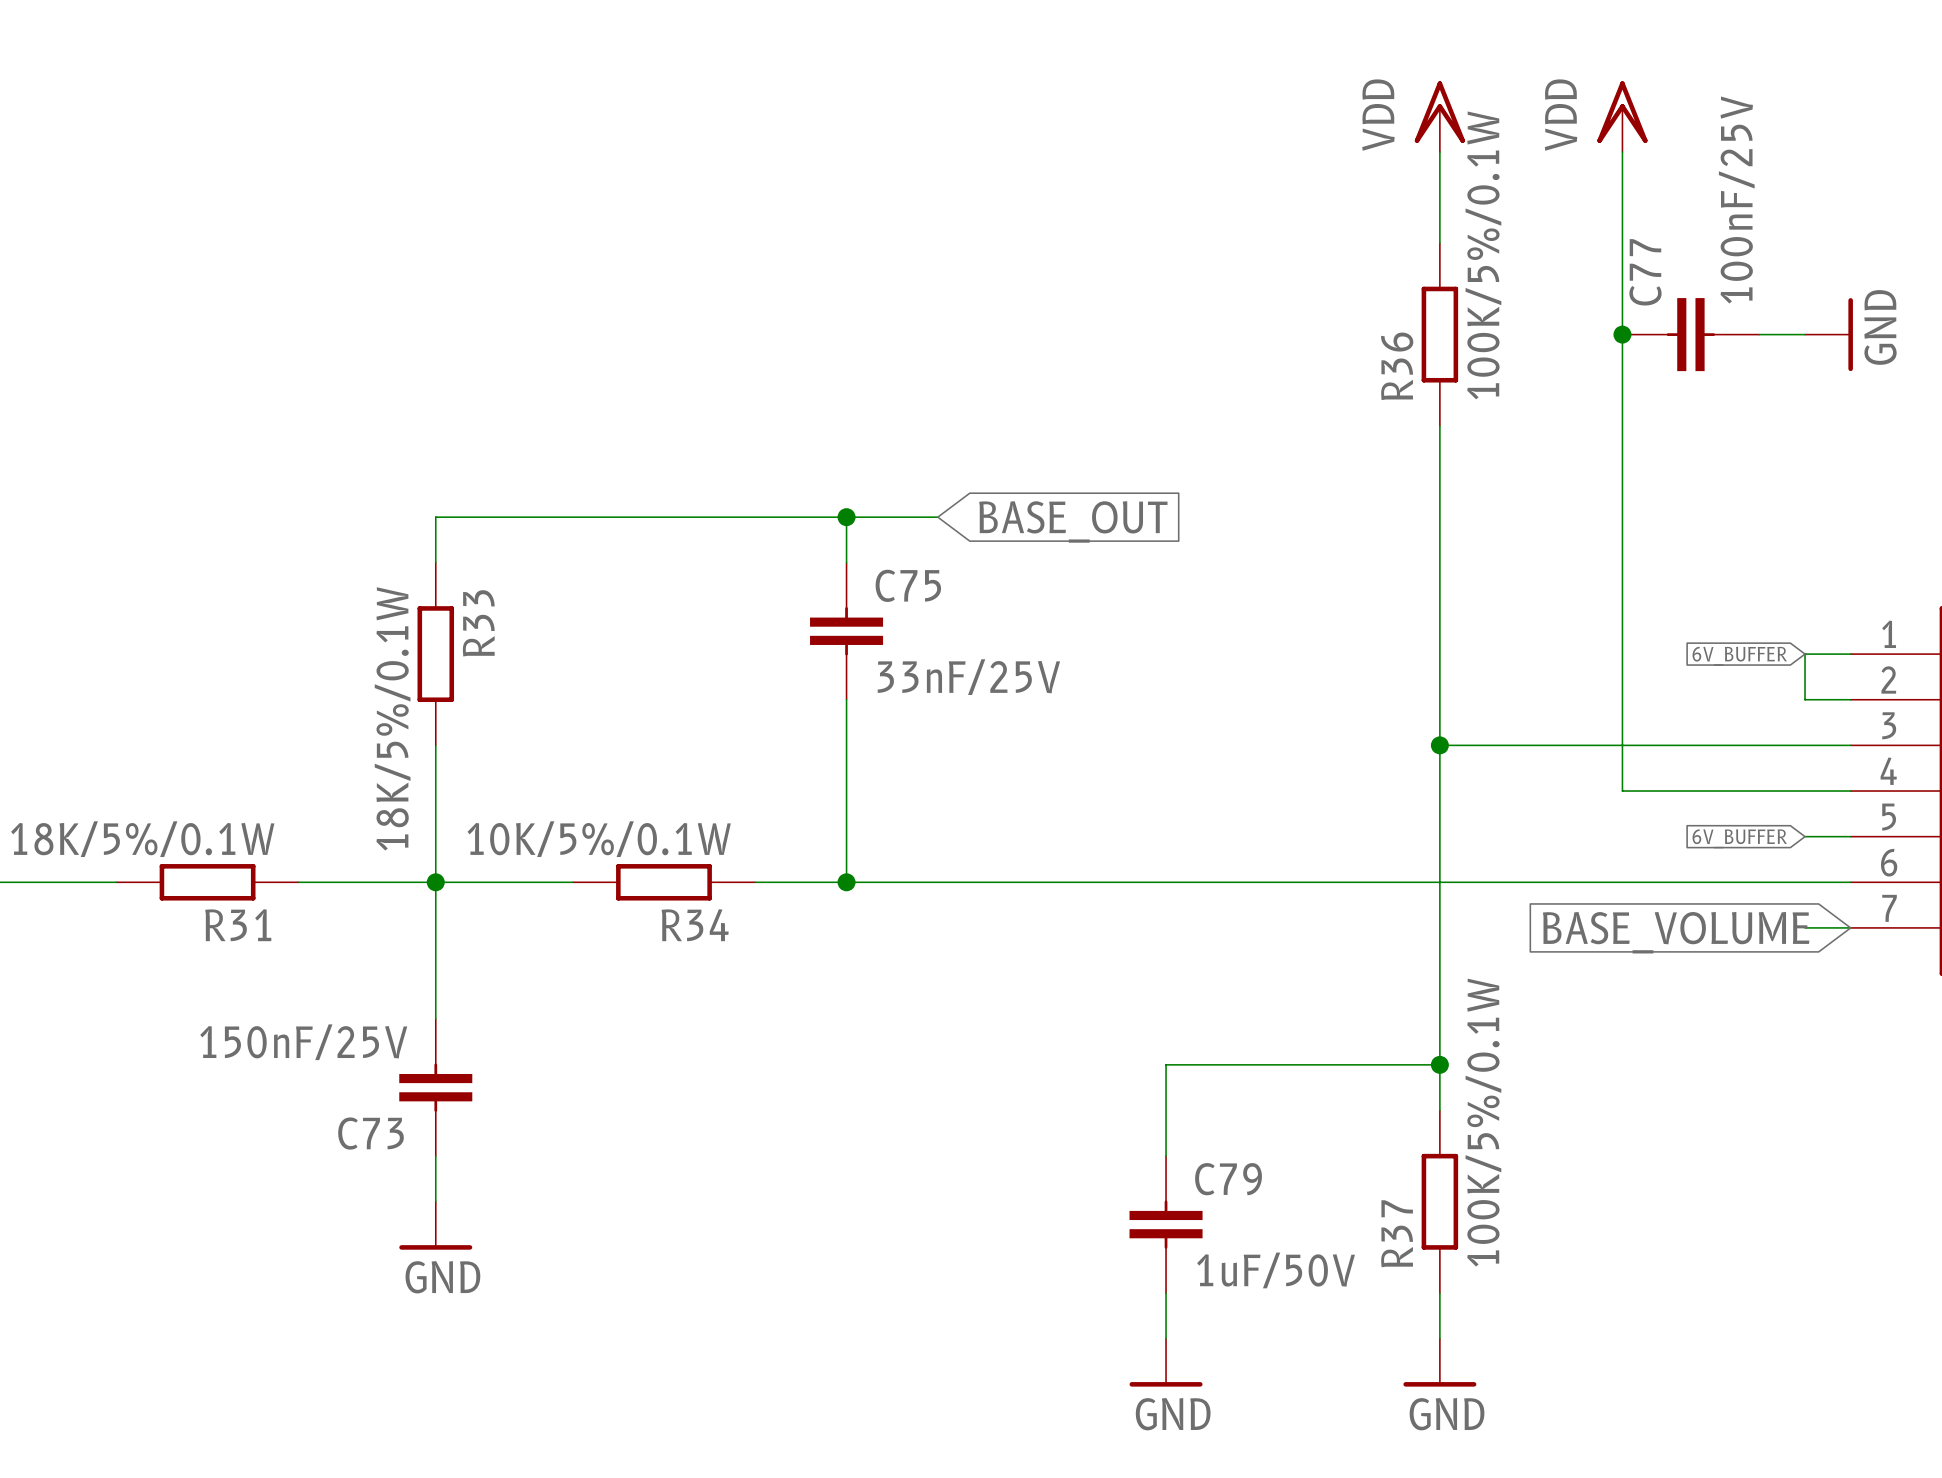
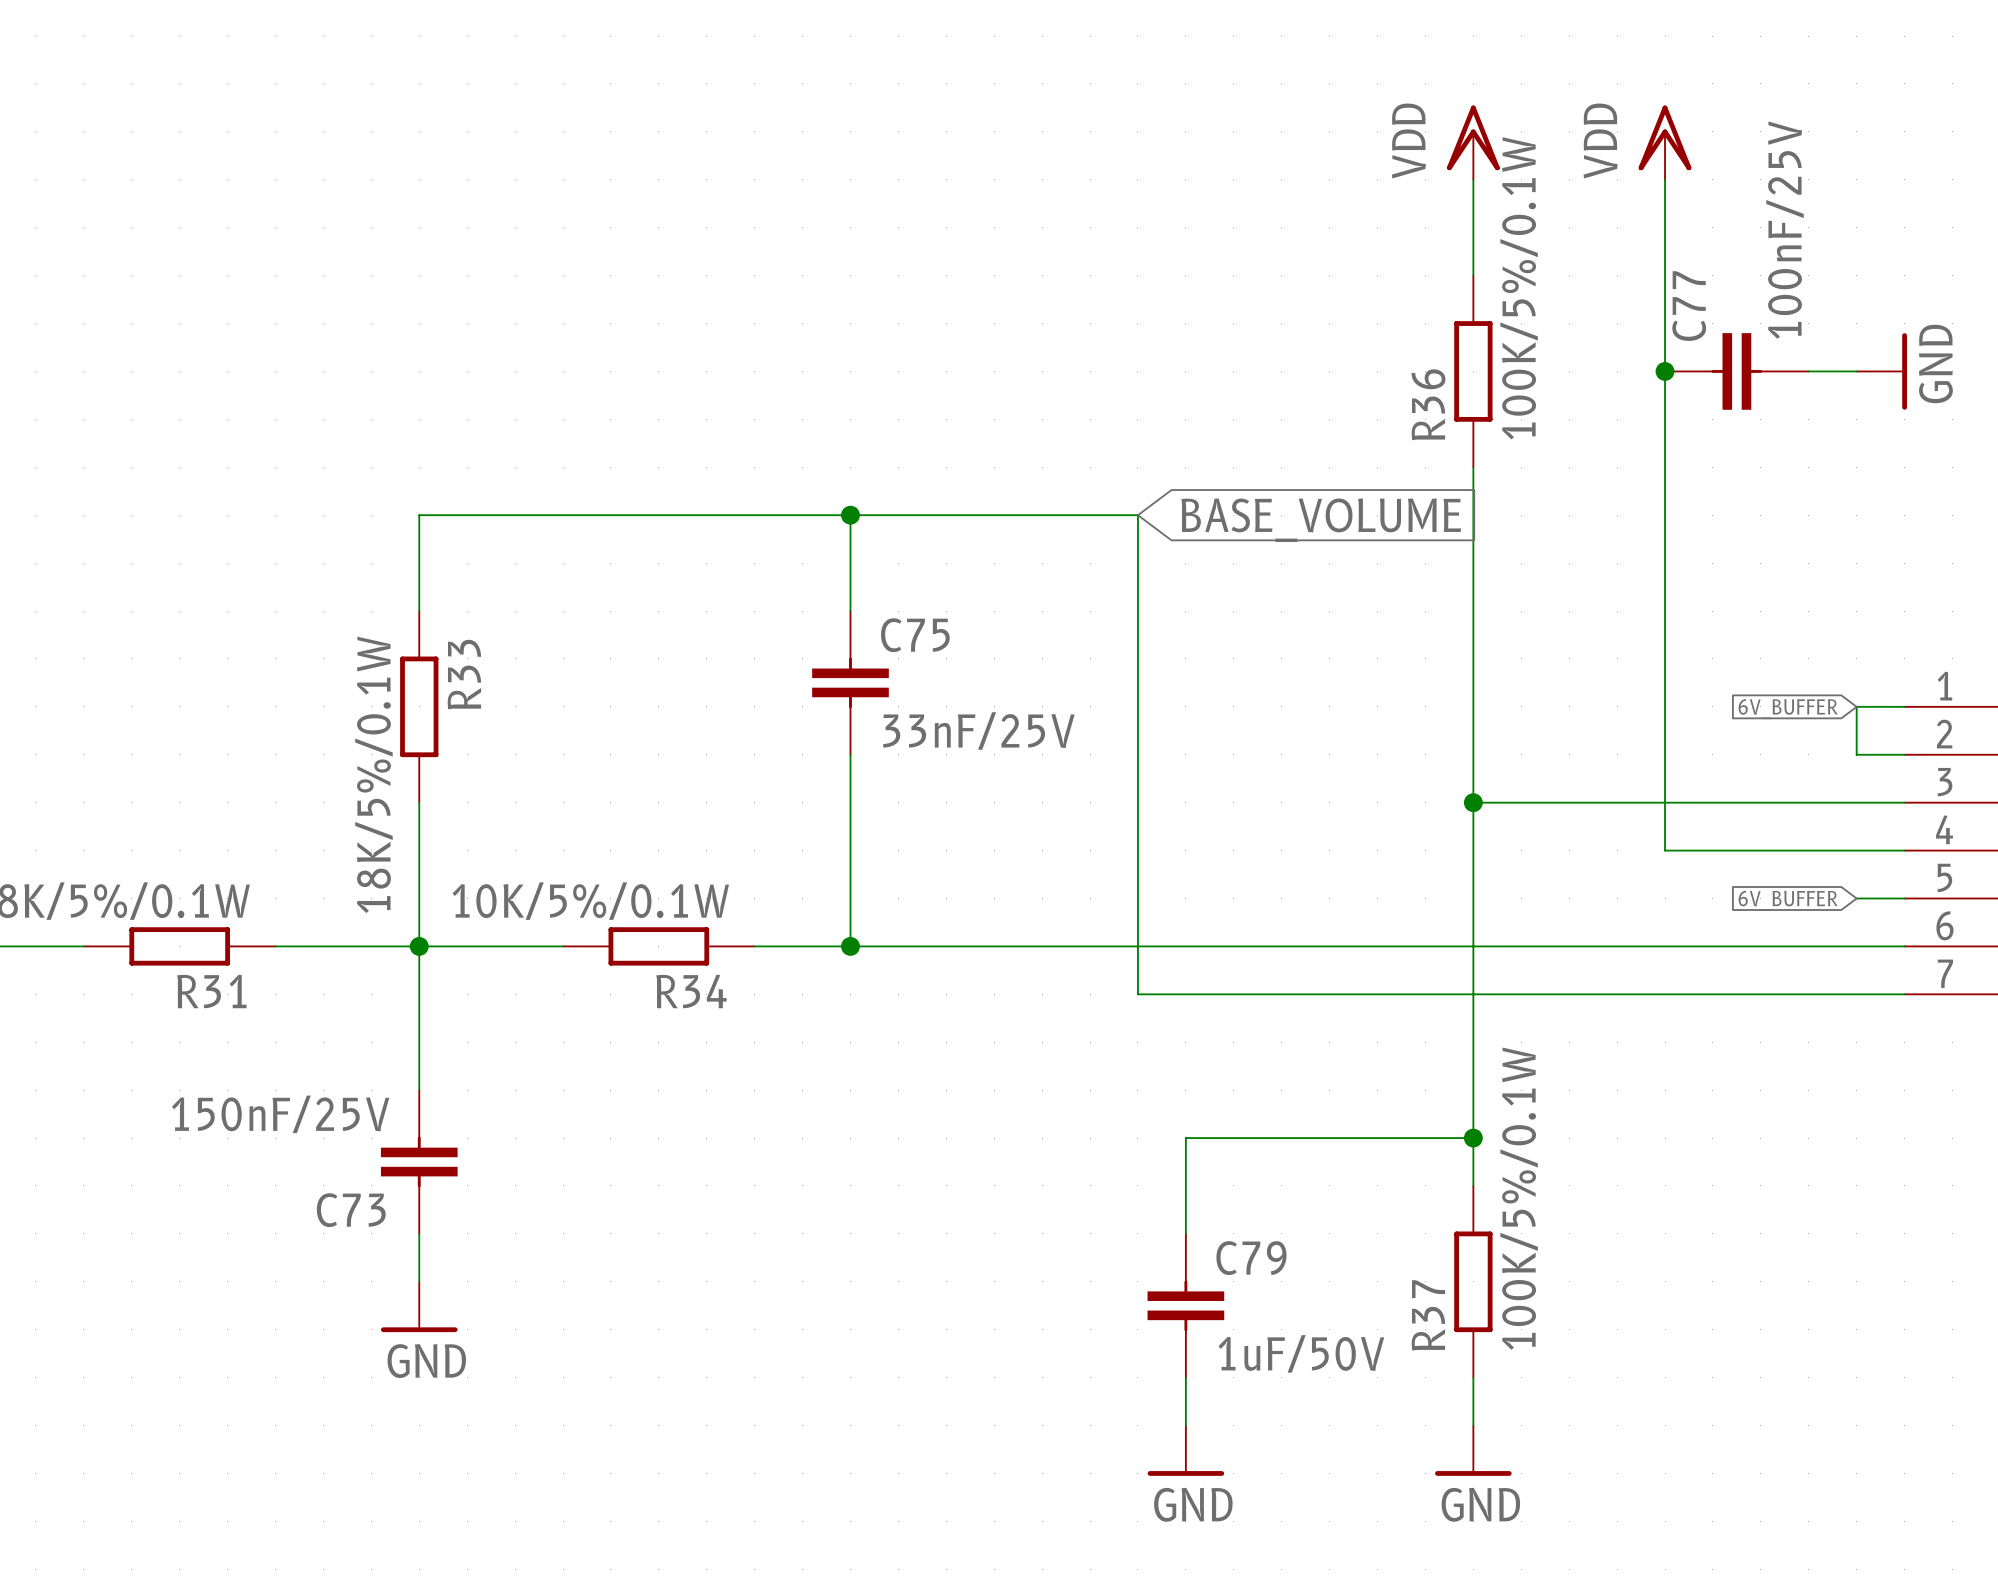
wire: none -> (850, 515) (850, 563)
wire: (435, 517) (937, 517) -> (419, 563) (419, 515) (1137, 515) (1137, 994) (1856, 994)
junction position: (846, 517) -> (850, 515)
global label: BASE_OUT (1073, 521) -> BASE_VOLUME (1321, 520)
global label: BASE_VOLUME (1676, 932) -> none

